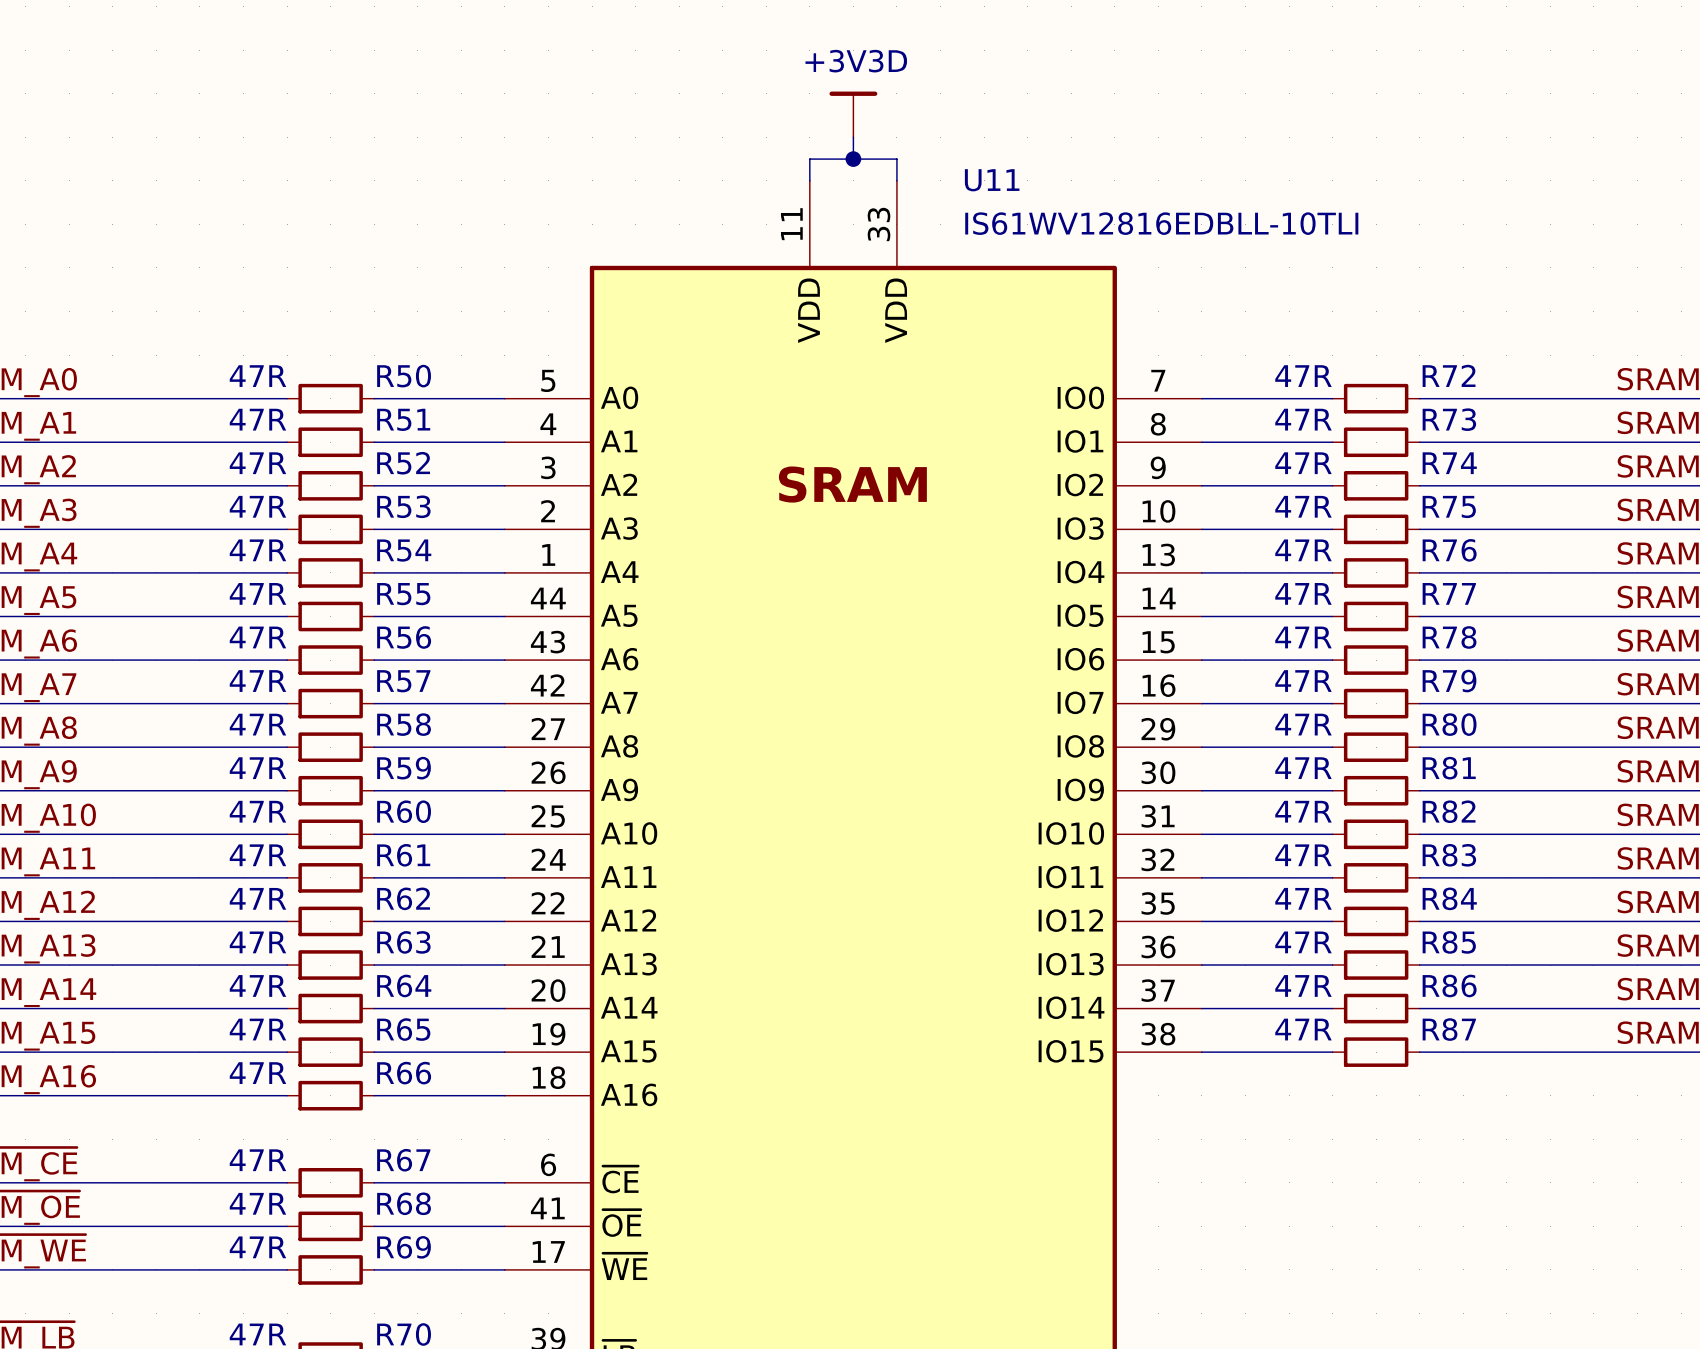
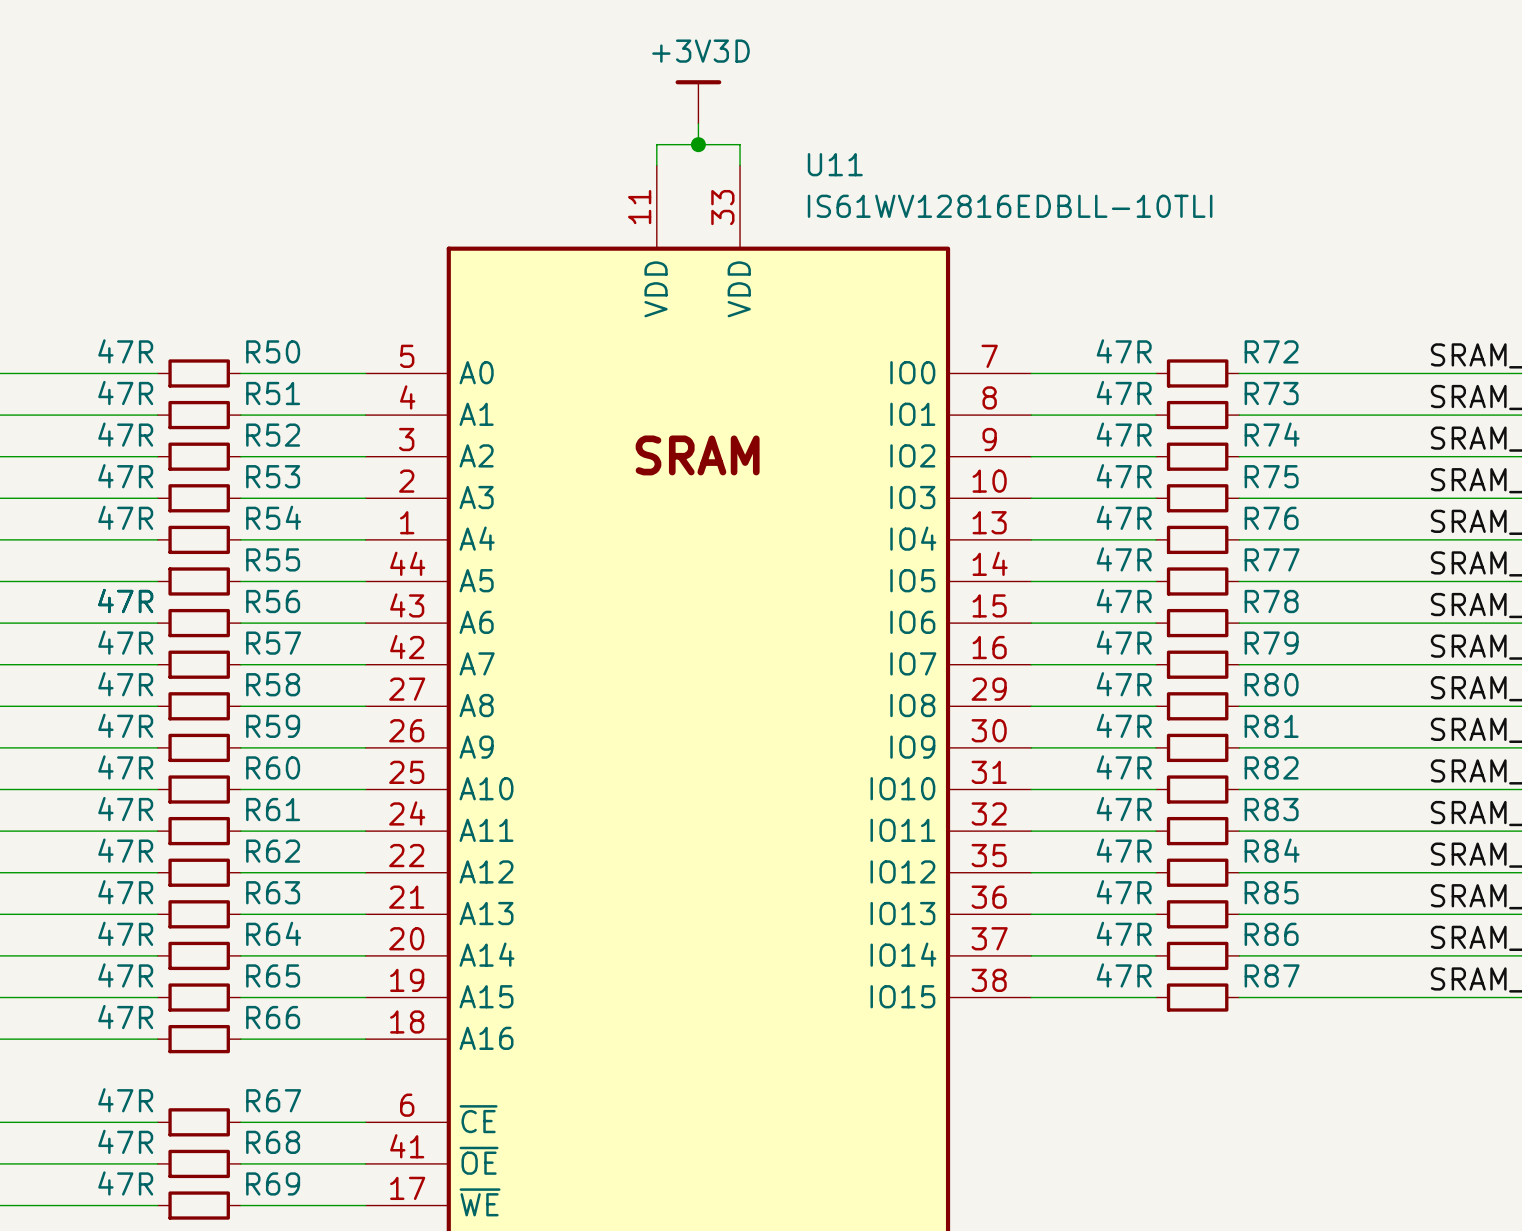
R55 value position: 47R (257, 593) -> 47R (125, 601)

